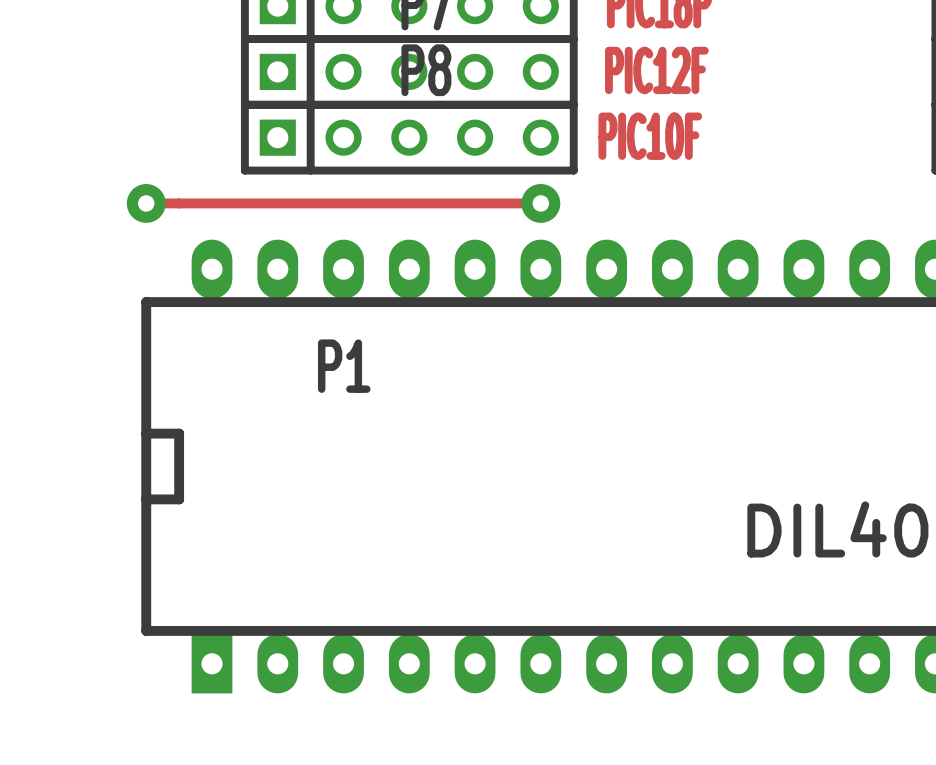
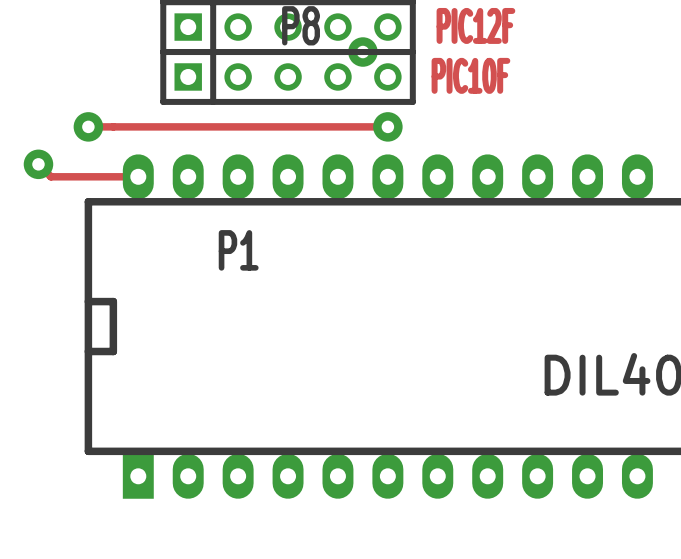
via: none -> (362, 52)
track: none -> (38, 164) (50, 176) (138, 176)
via: none -> (38, 164)

